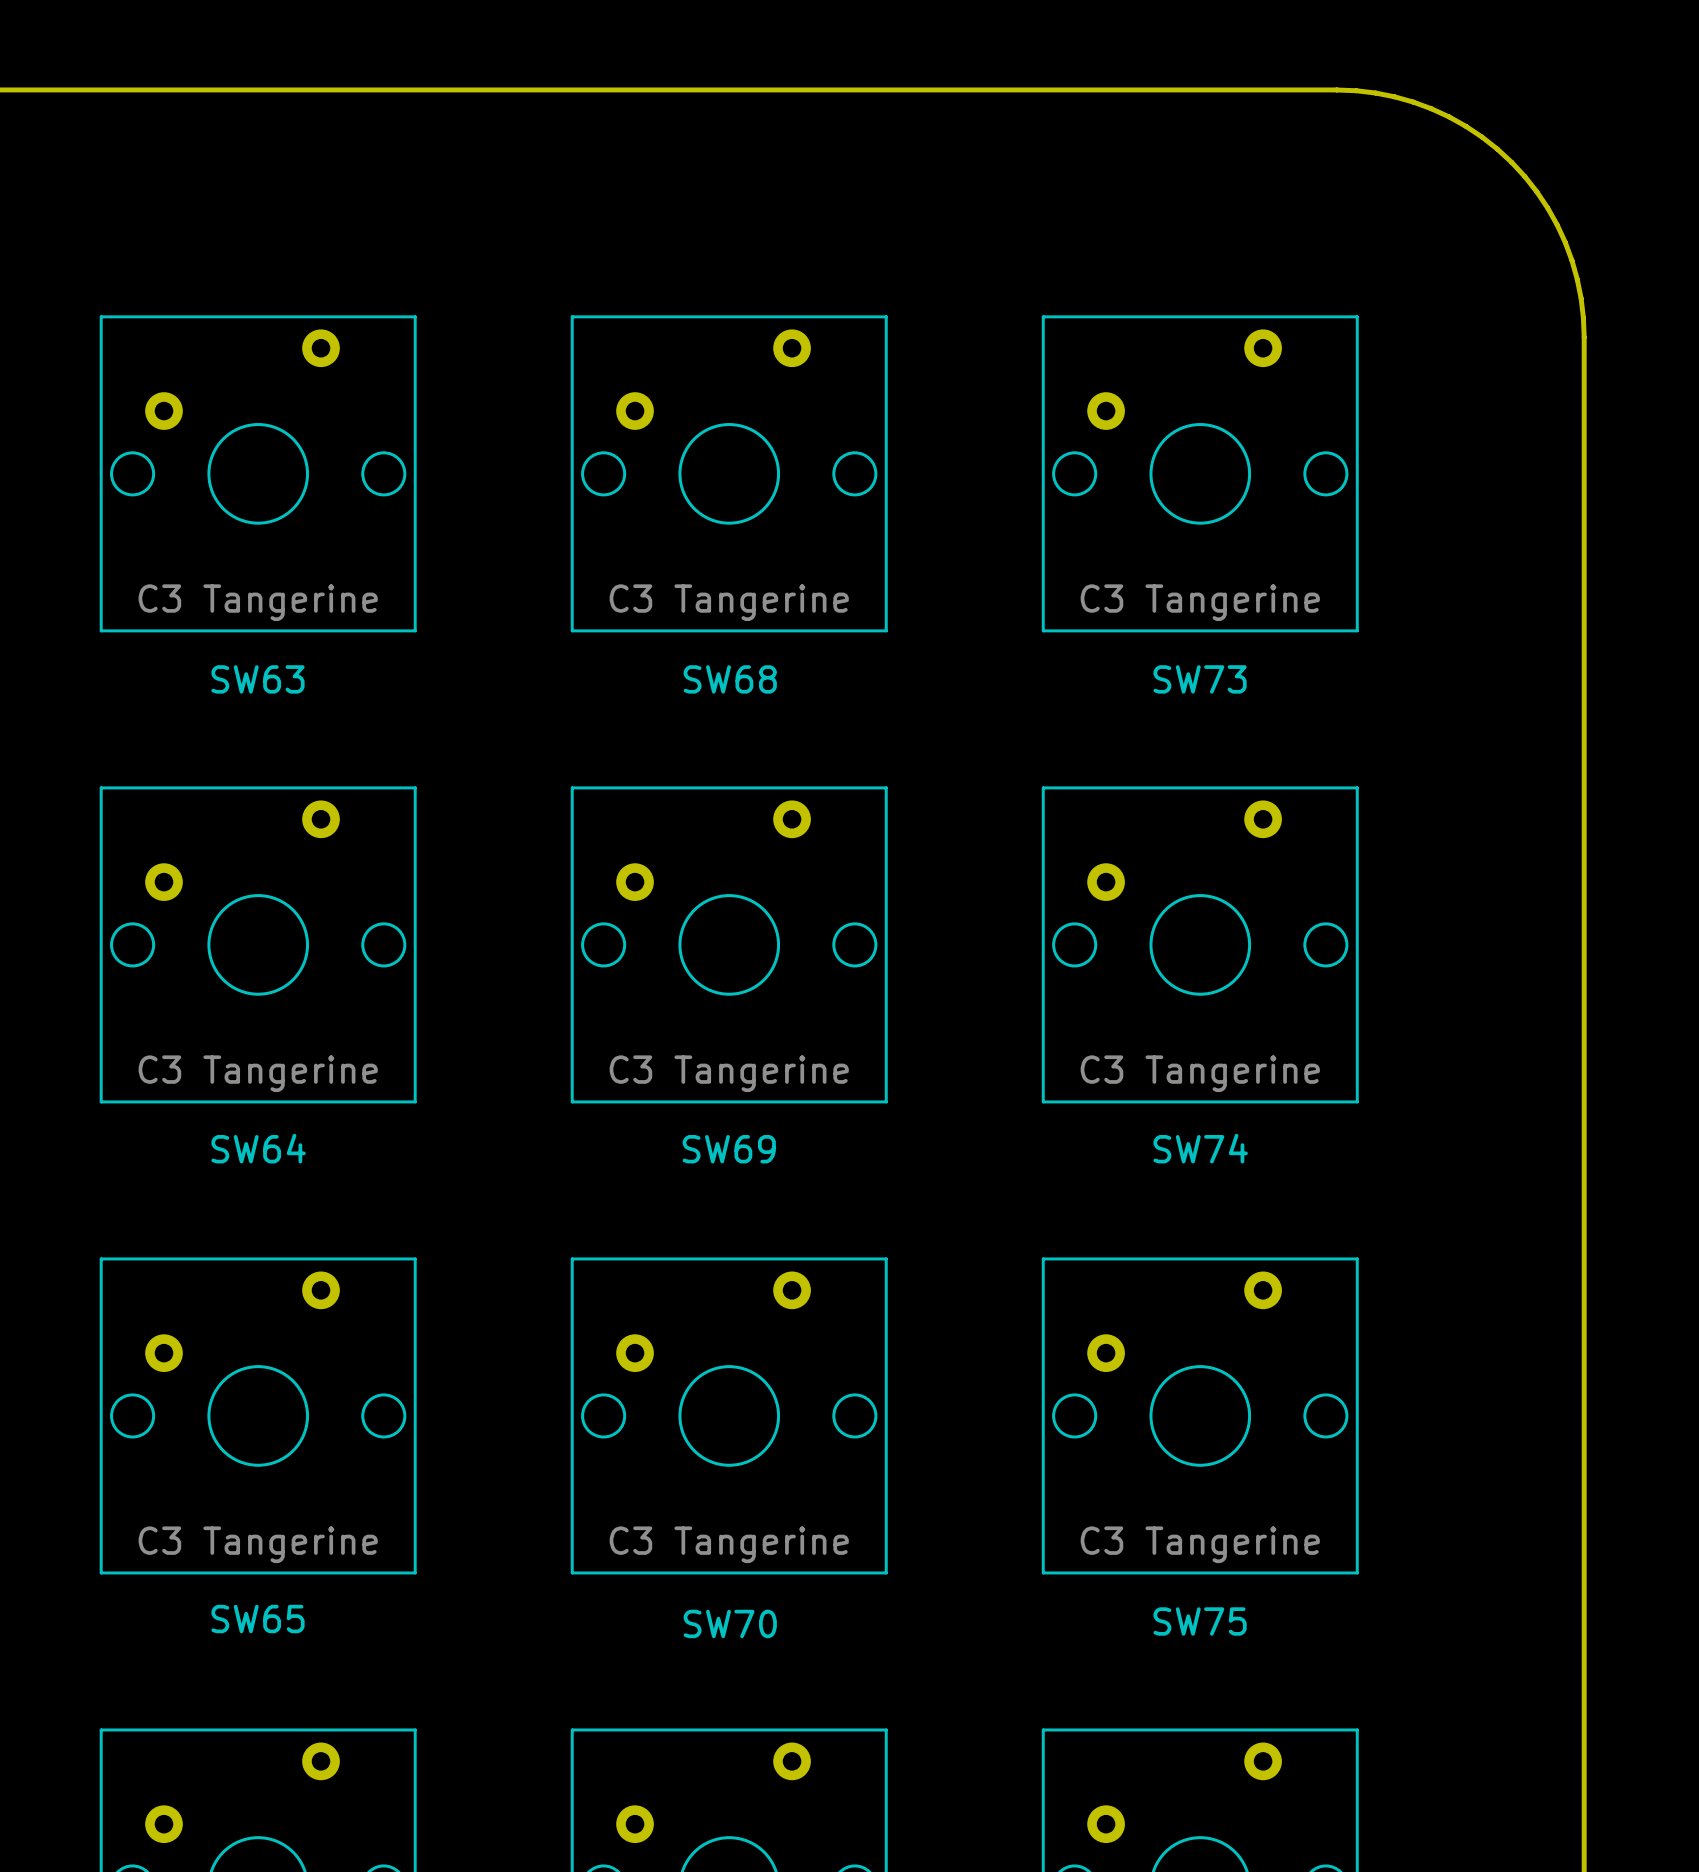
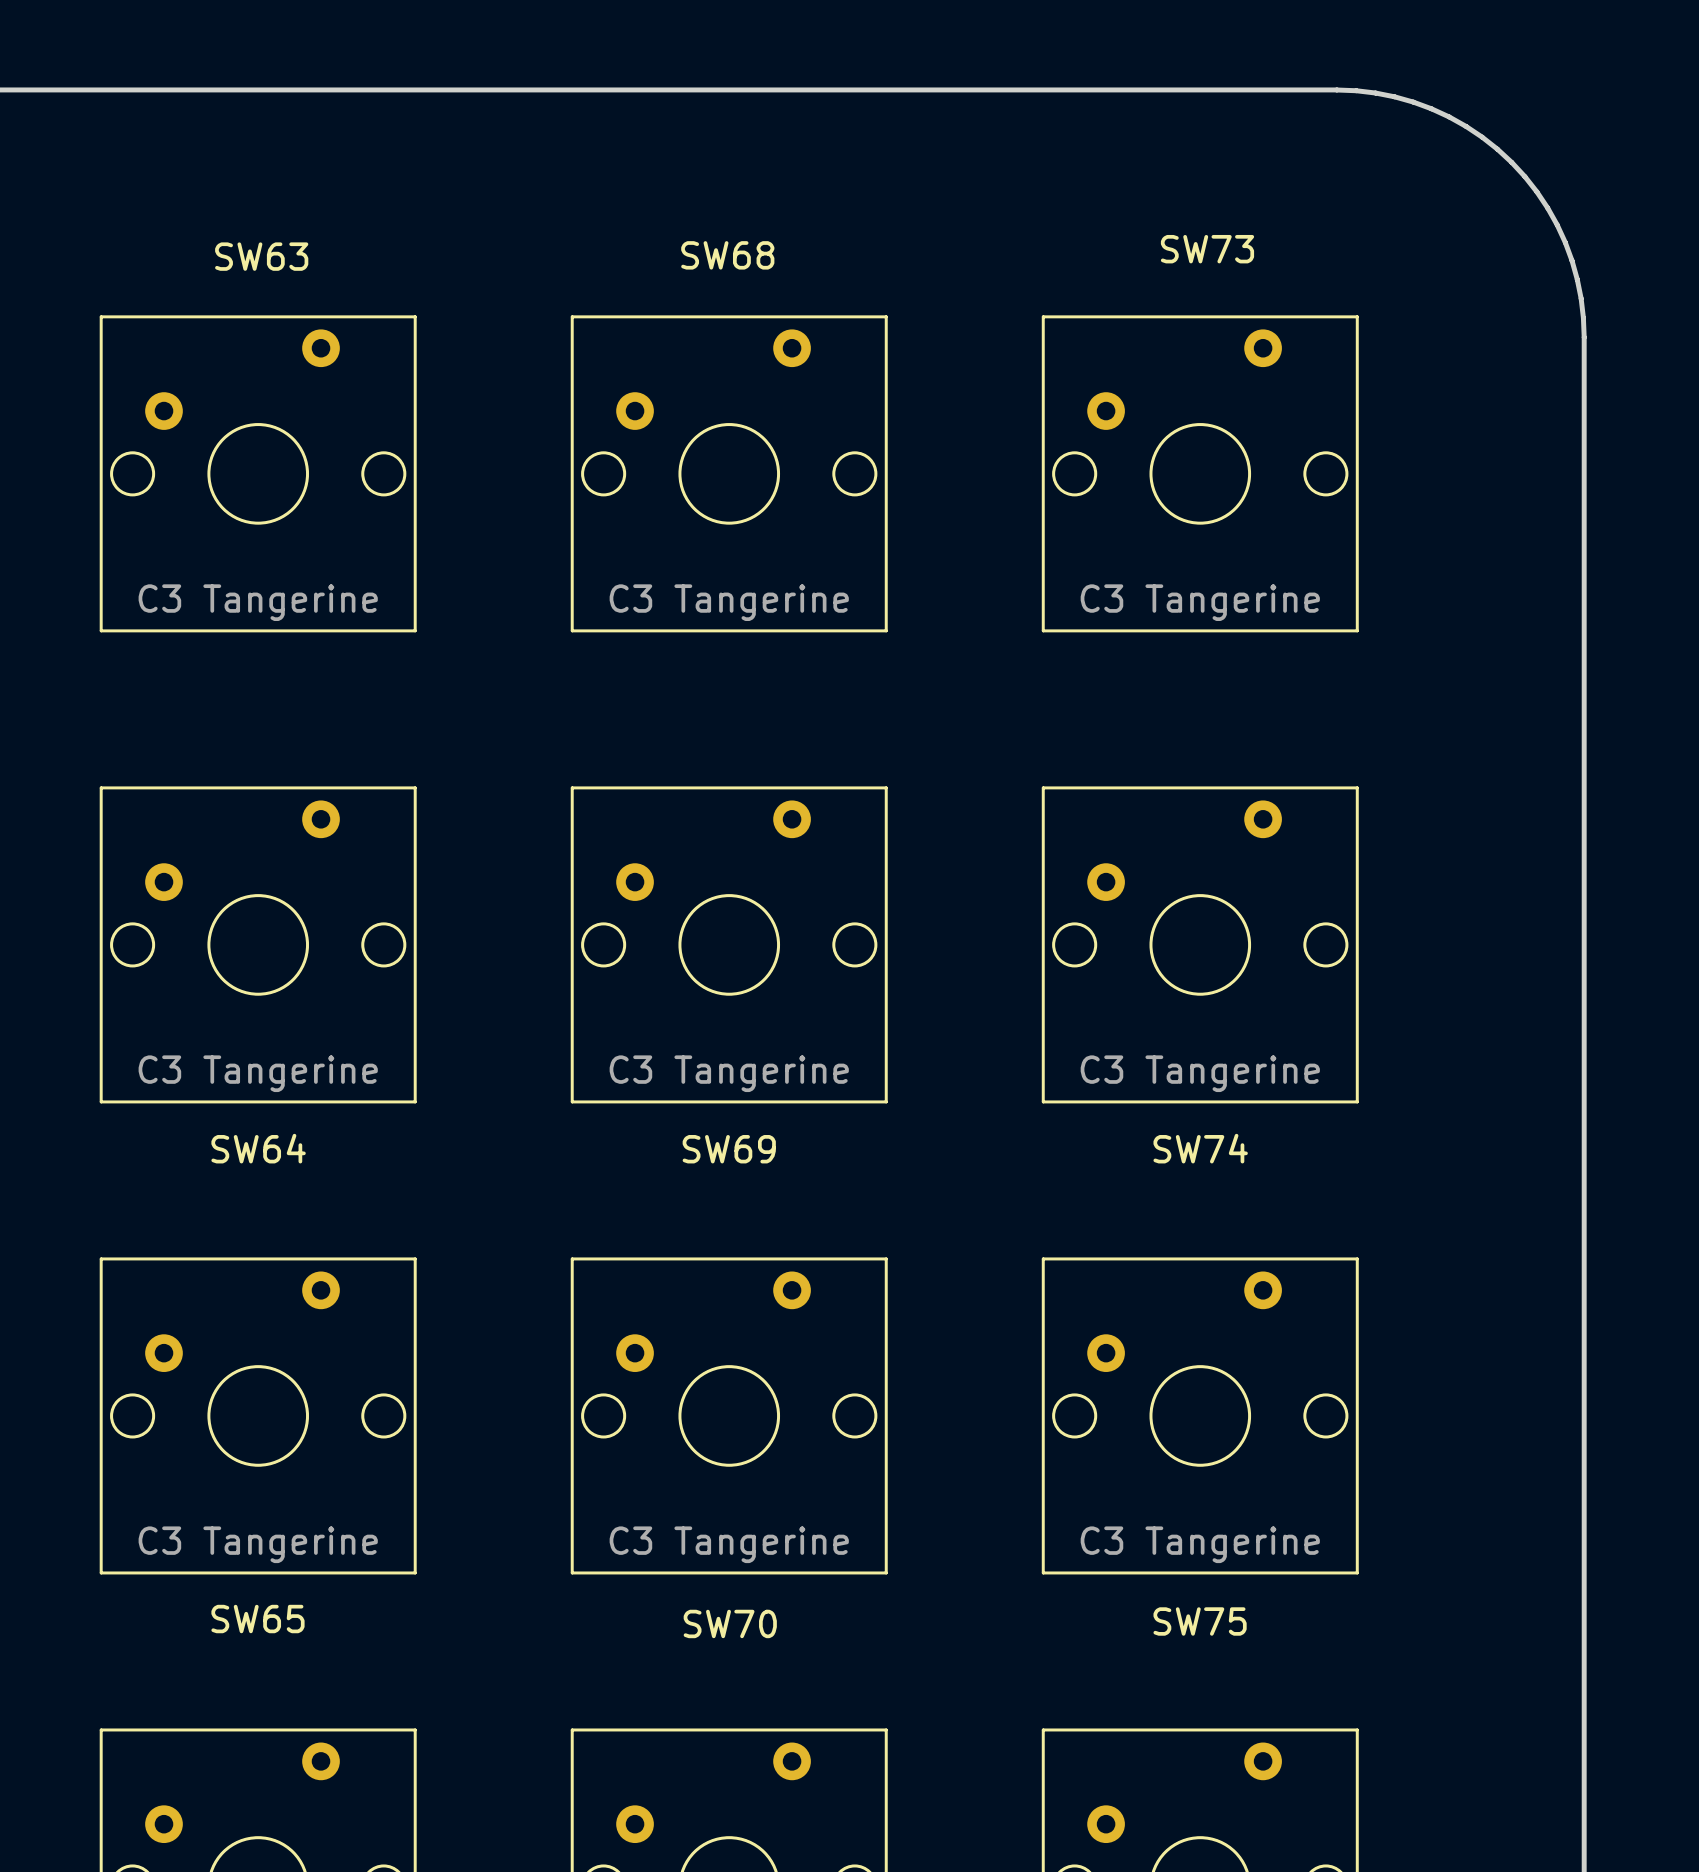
SW63 name position: SW63 (257, 679) -> SW63 (261, 256)
SW68 name position: SW68 (730, 679) -> SW68 (727, 255)
SW73 name position: SW73 (1200, 679) -> SW73 (1207, 249)

